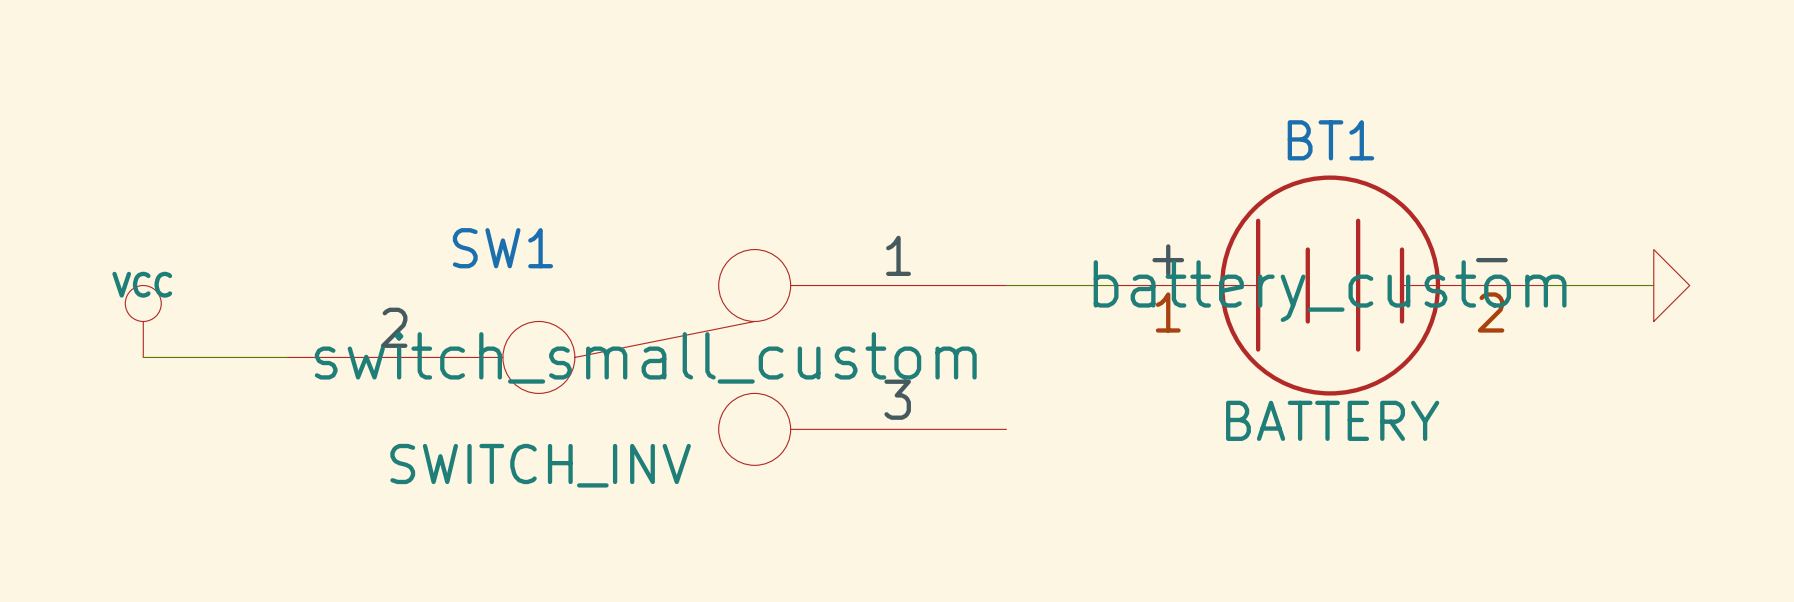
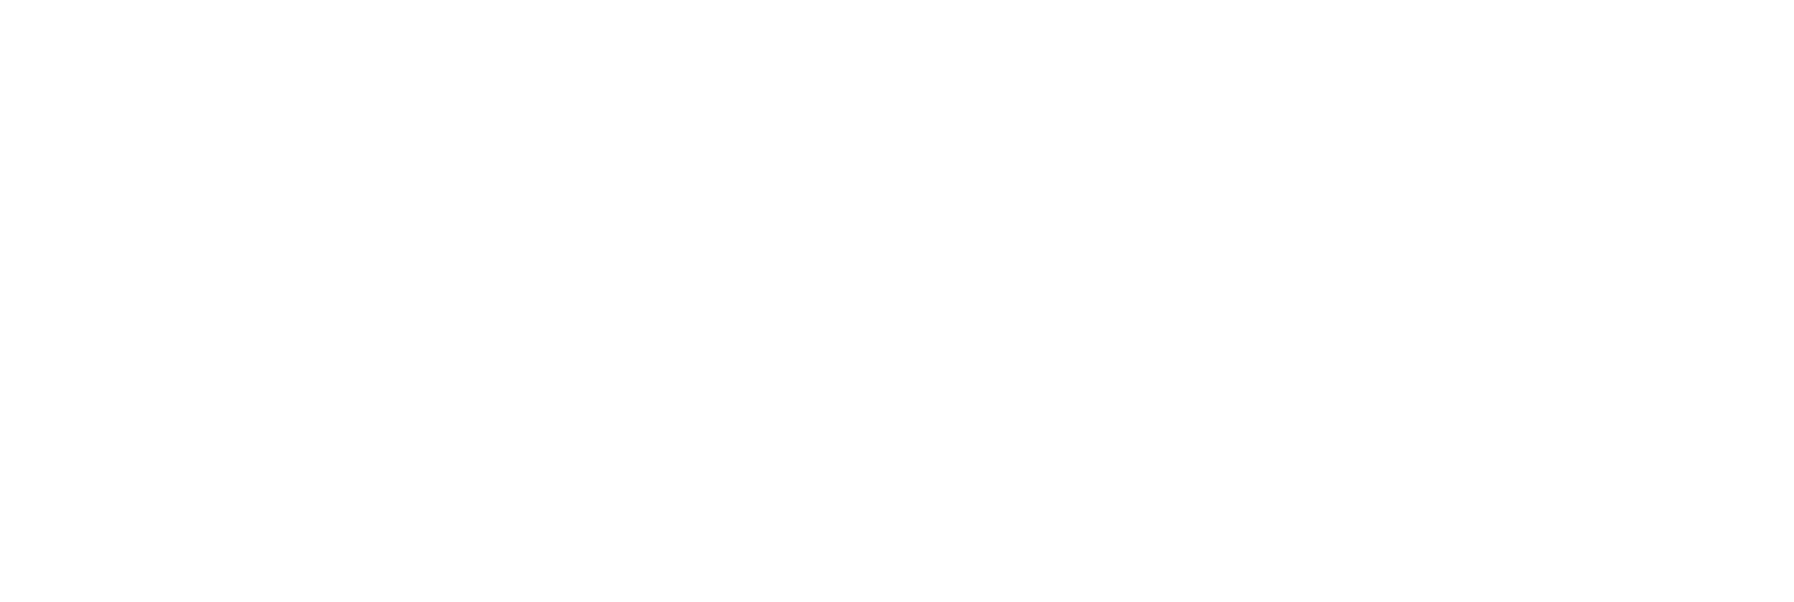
wire: (1006, 285) (1114, 285) -> none
BT1: BATTERY (1330, 285) -> none
wire: (1545, 285) (1653, 285) -> none
power symbol: (1671, 285) -> none
power symbol: VCC (143, 321) -> none
wire: (143, 357) (287, 357) -> none
SW1: SWITCH_INV (646, 357) -> none

